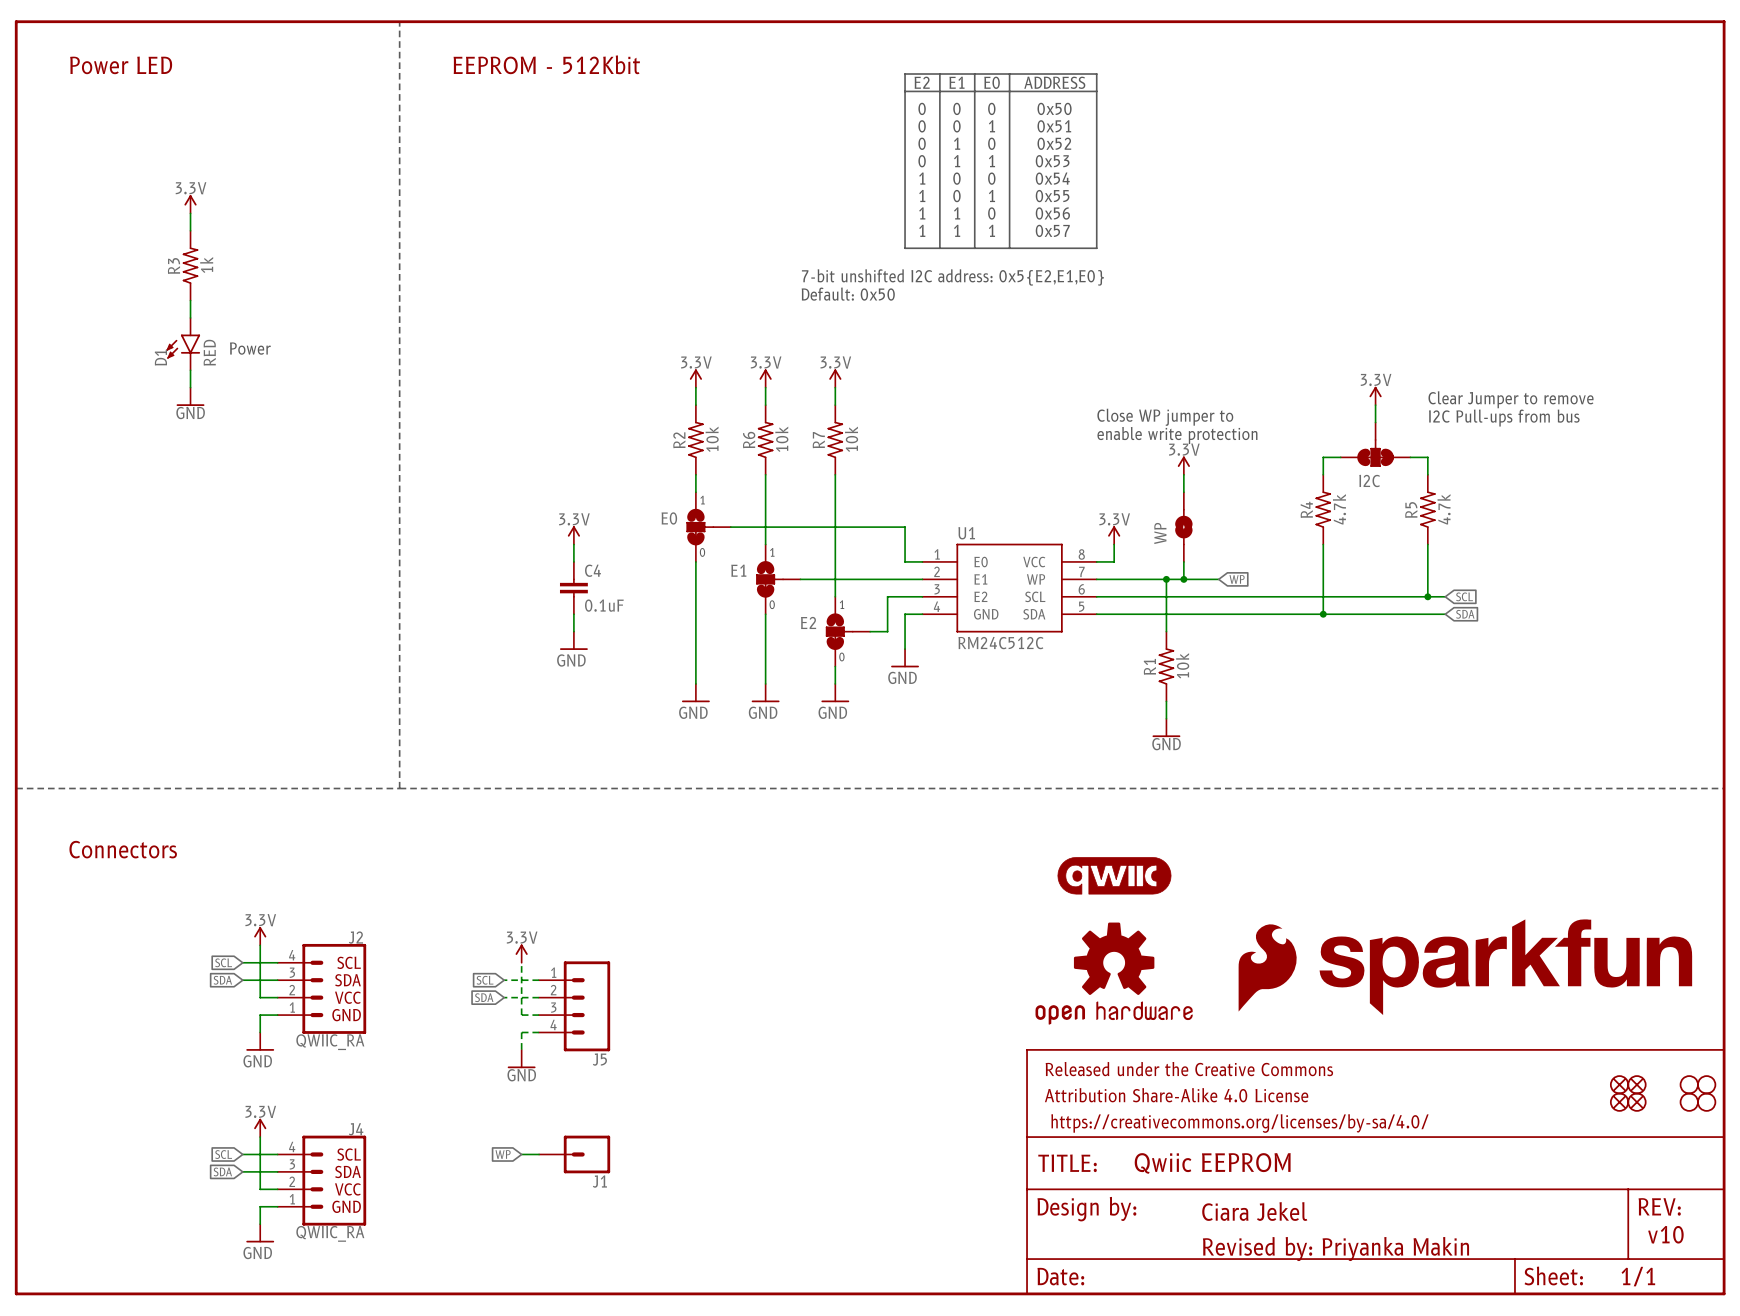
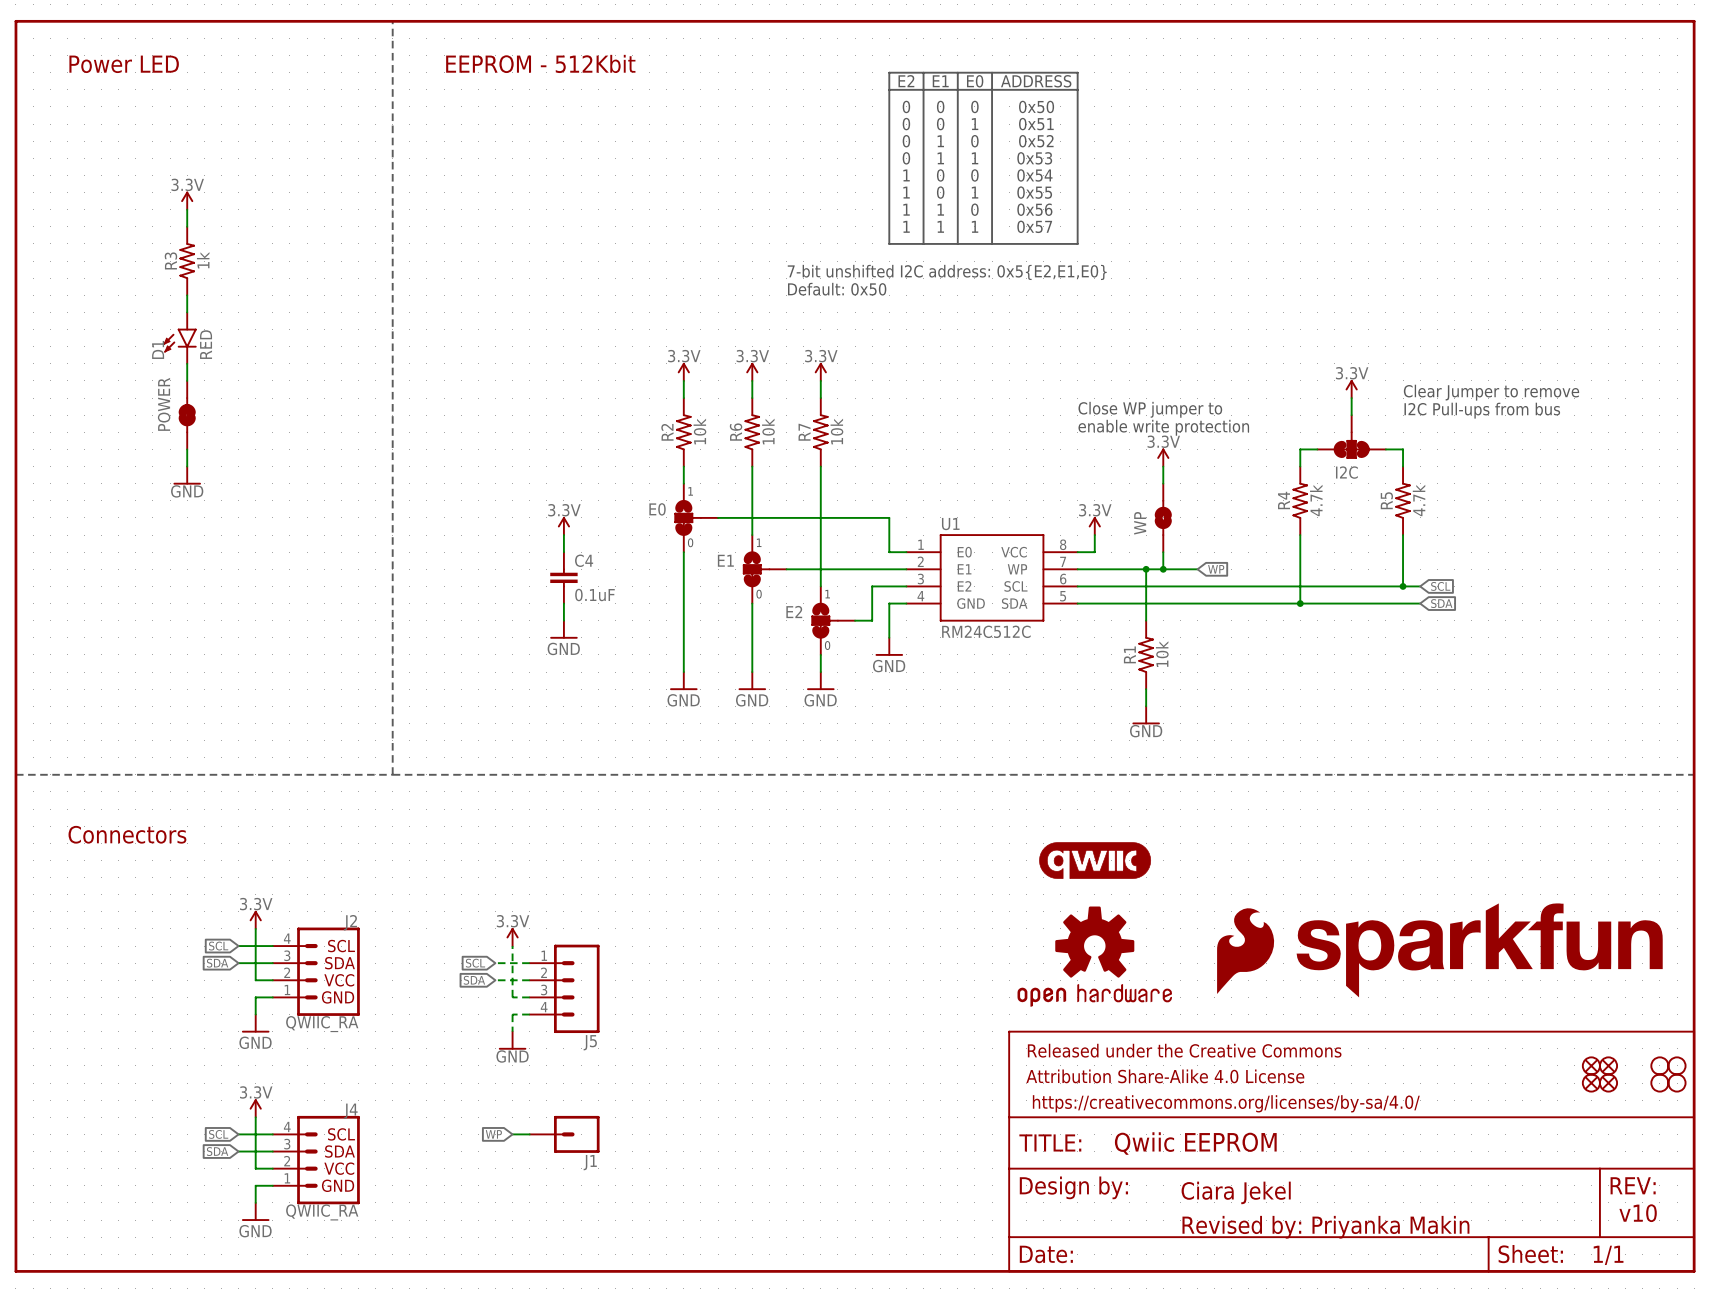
text: Power (250, 348) -> none
power symbol position: GND (190, 396) -> GND (187, 475)
POWER: none -> (187, 415)
wire: none -> (187, 449) (187, 466)

